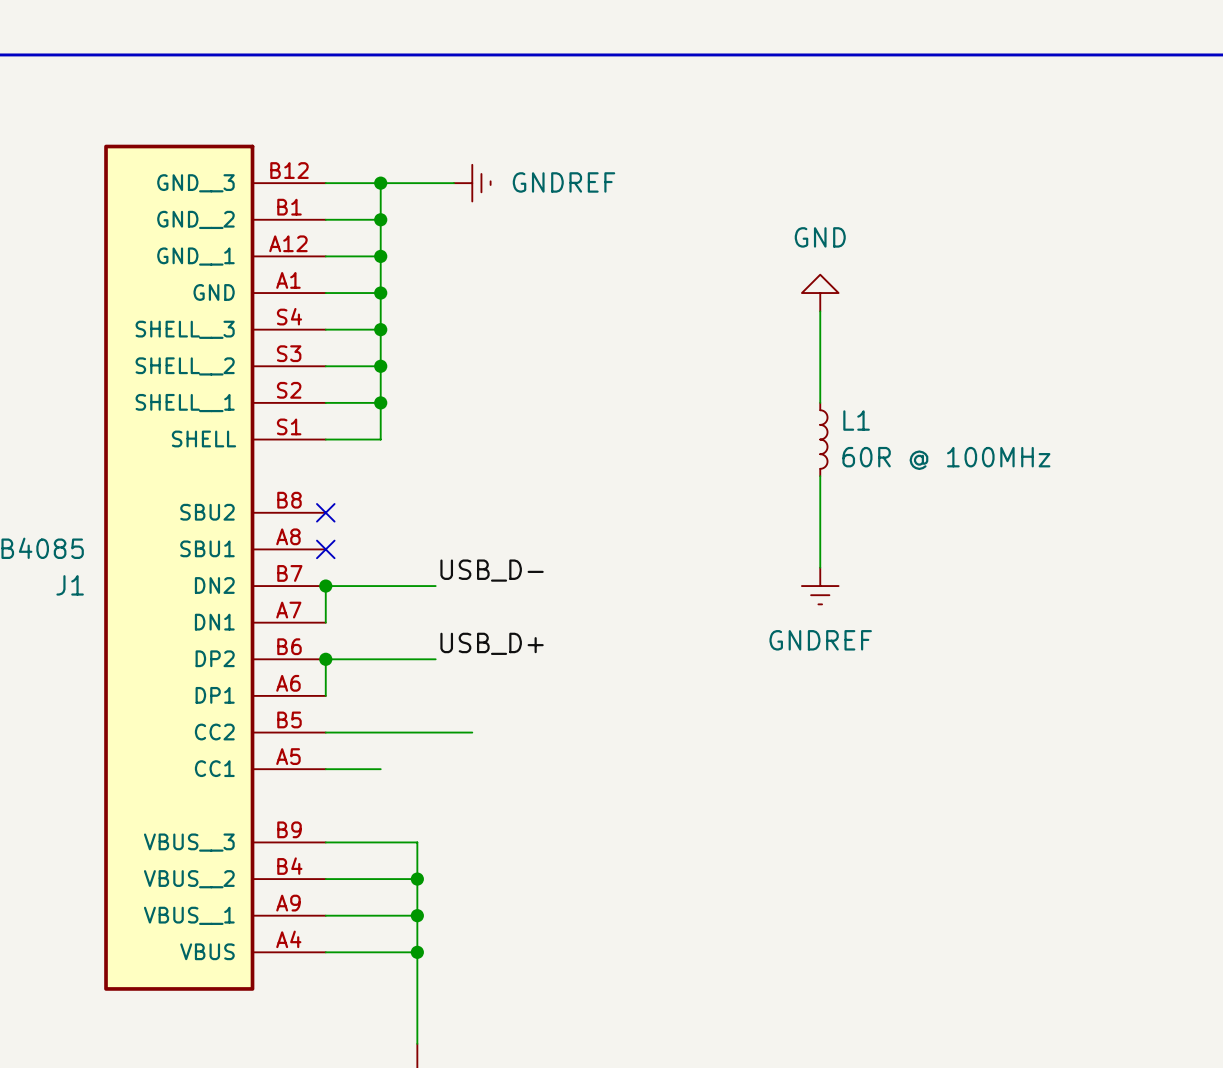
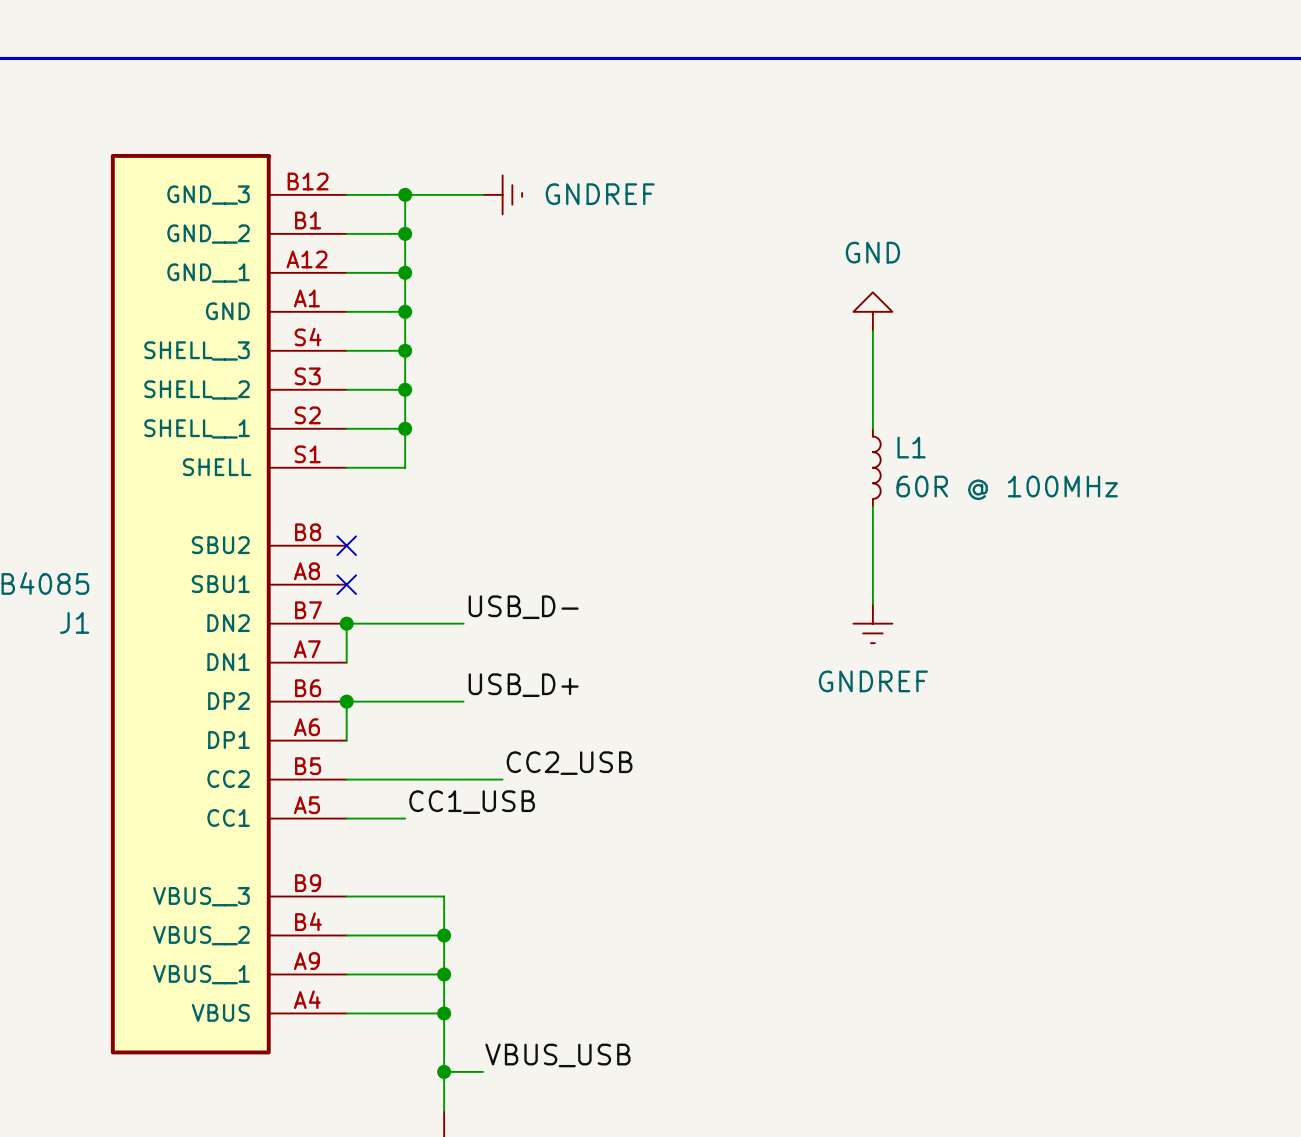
label: none -> CC2_USB (569, 763)
label: none -> CC1_USB (472, 802)
label: none -> VBUS_USB (557, 1055)
wire: none -> (444, 1071) (483, 1071)
junction: none -> (444, 1071)

